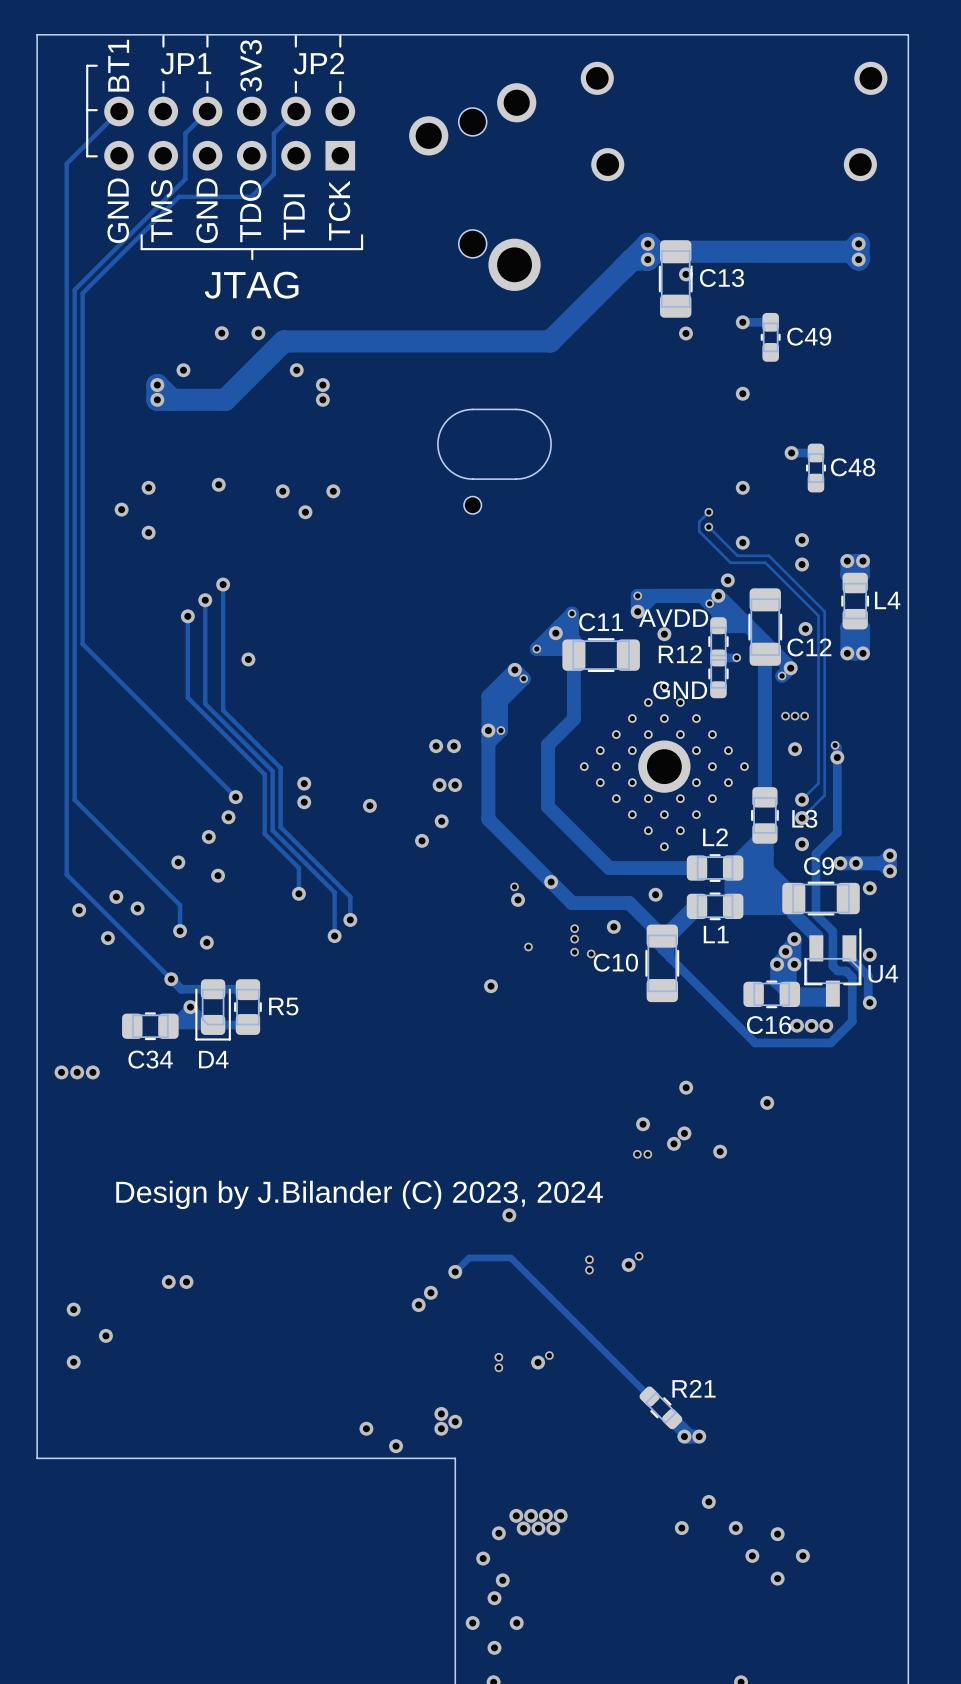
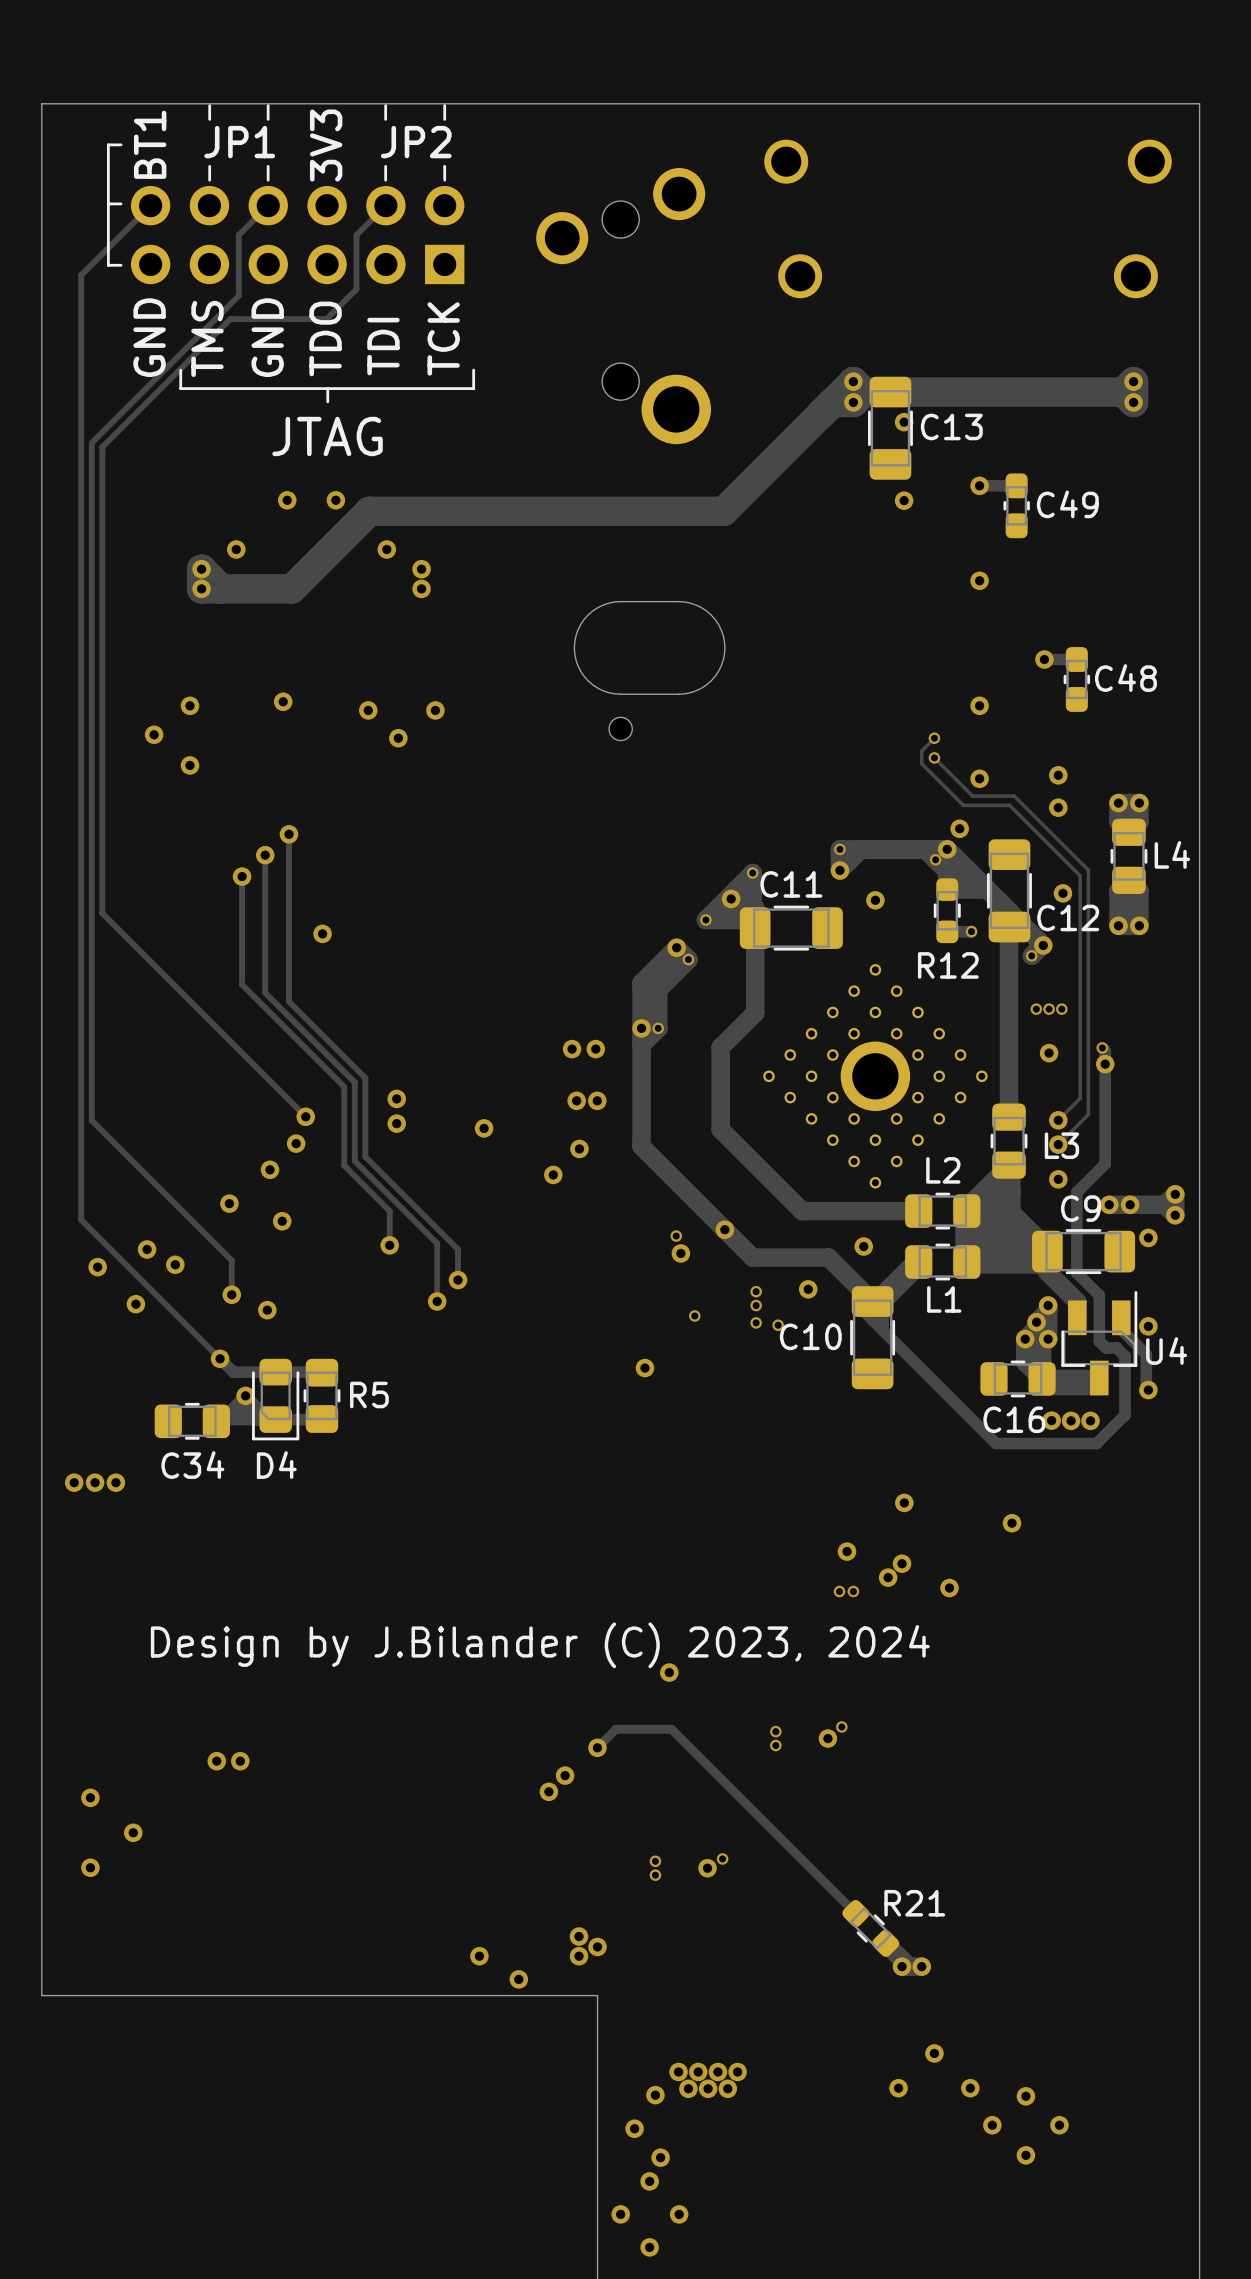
R12 footprint: [708, 617, 729, 699] -> [933, 878, 961, 944]
text: AVDD (673, 618) -> none
R12 name position: R12 (680, 654) -> R12 (948, 965)
text: GND (680, 690) -> none

